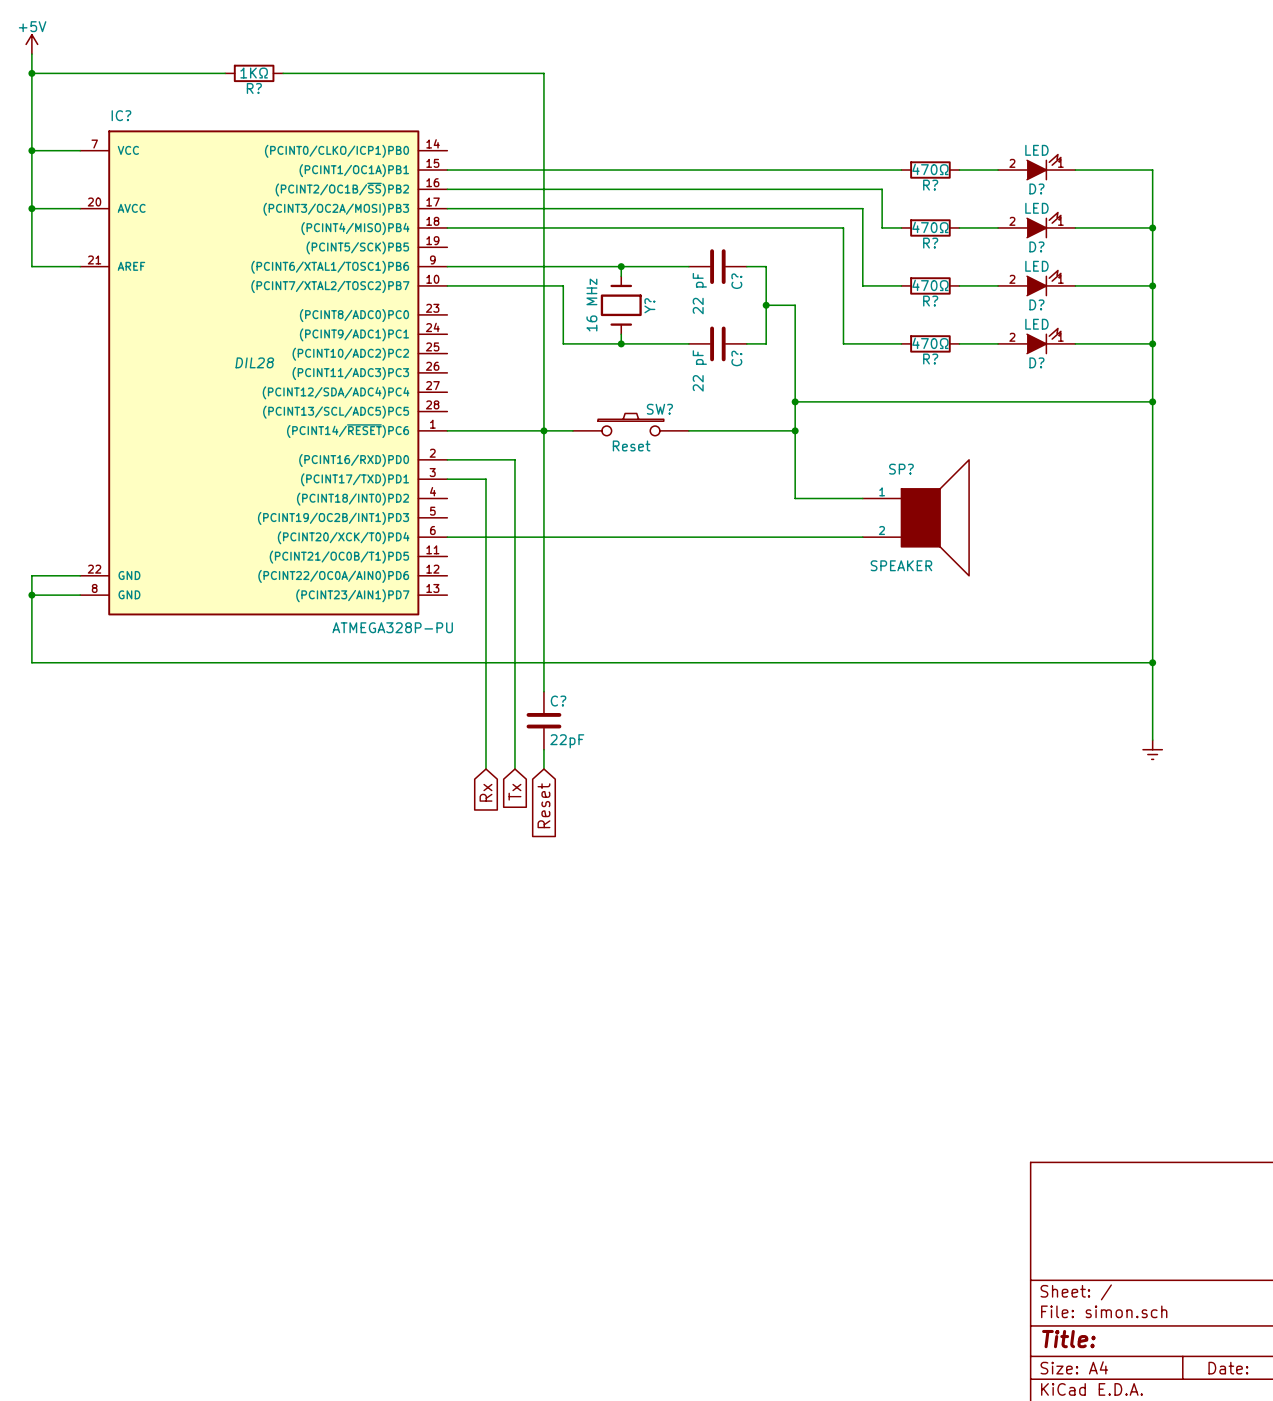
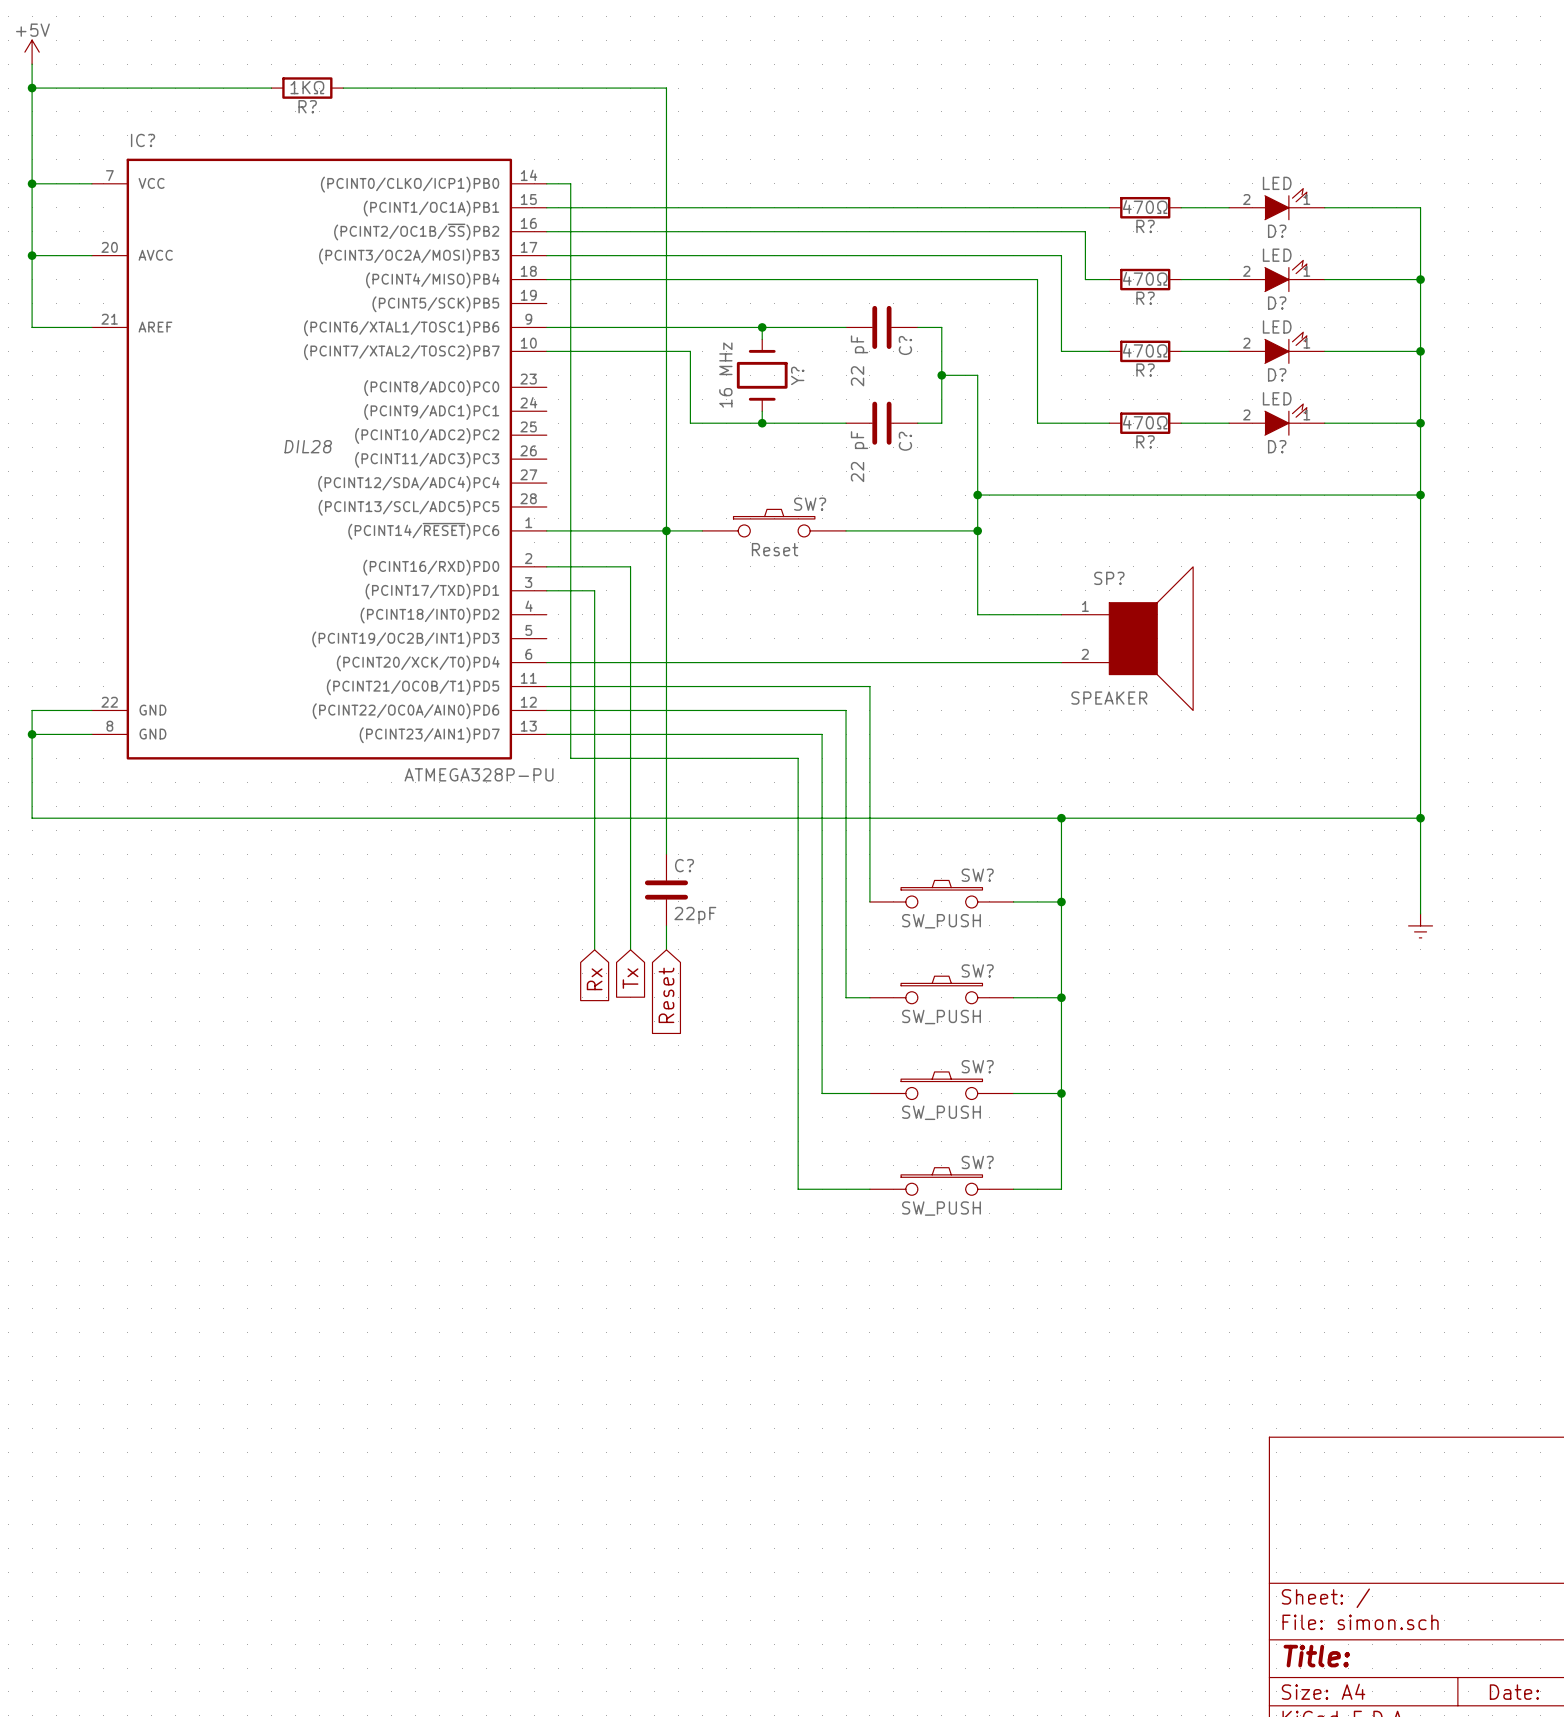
wire: none -> (546, 183) (570, 183) (570, 758) (798, 758) (798, 1189) (869, 1189)
wire: none -> (546, 686) (869, 686) (869, 901)
wire: none -> (546, 710) (846, 710) (846, 997) (869, 997)
wire: none -> (546, 734) (822, 734) (822, 1093) (869, 1093)
wire: none -> (1061, 818) (1061, 1189) (1013, 1189)
junction: none -> (1061, 818)
SW?: none -> SW_PUSH (941, 894)
wire: none -> (1013, 901) (1061, 901)
junction: none -> (1061, 901)
SW?: none -> SW_PUSH (941, 989)
wire: none -> (1013, 997) (1061, 997)
junction: none -> (1061, 997)
SW?: none -> SW_PUSH (941, 1085)
wire: none -> (1013, 1093) (1061, 1093)
junction: none -> (1061, 1093)
SW?: none -> SW_PUSH (941, 1181)

